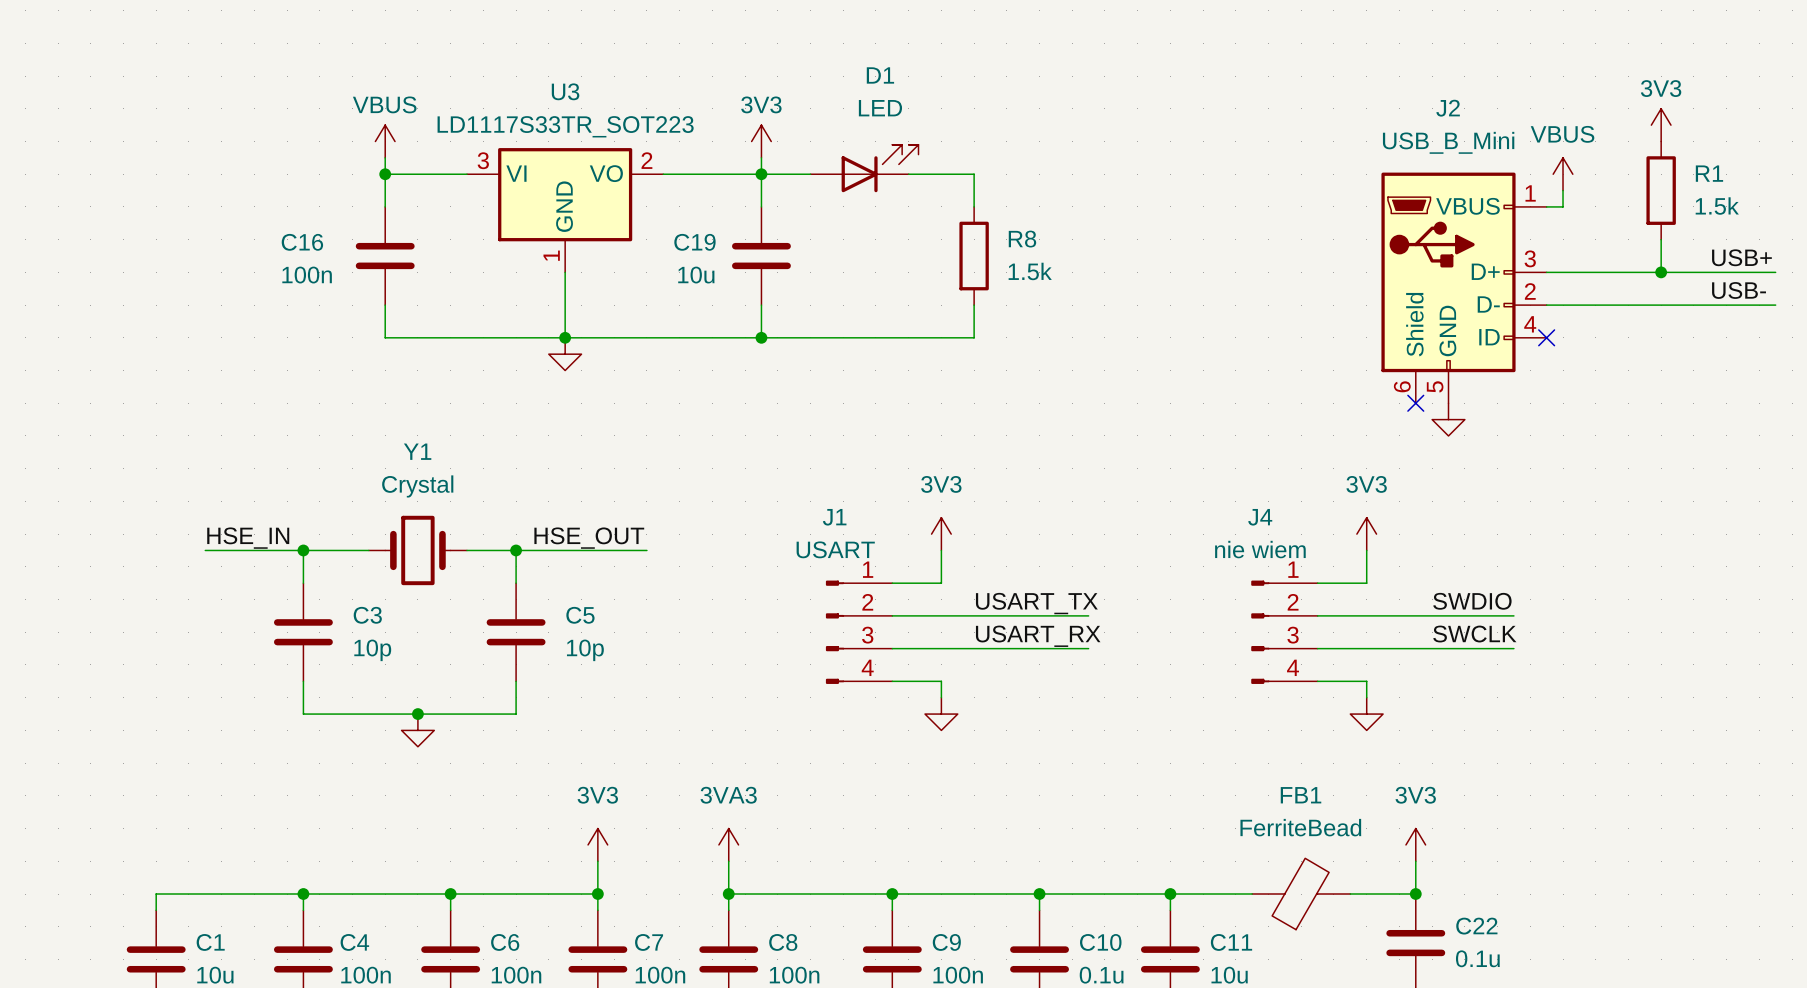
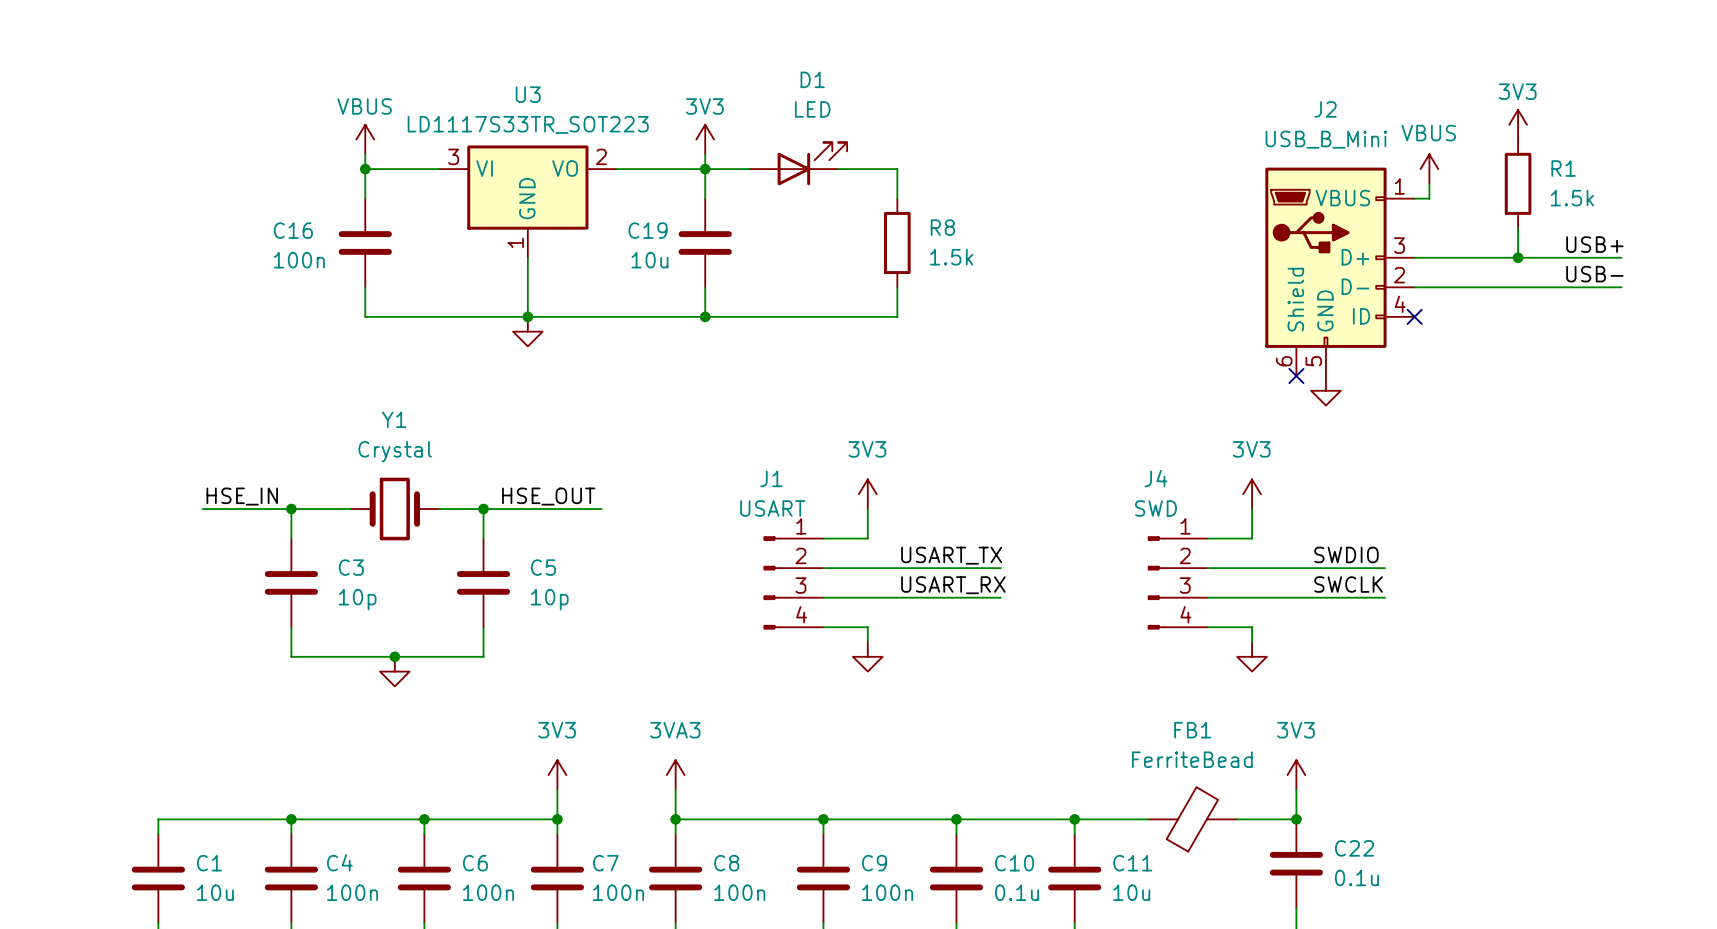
J4 value: nie wiem (1260, 549) -> SWD (1155, 508)

